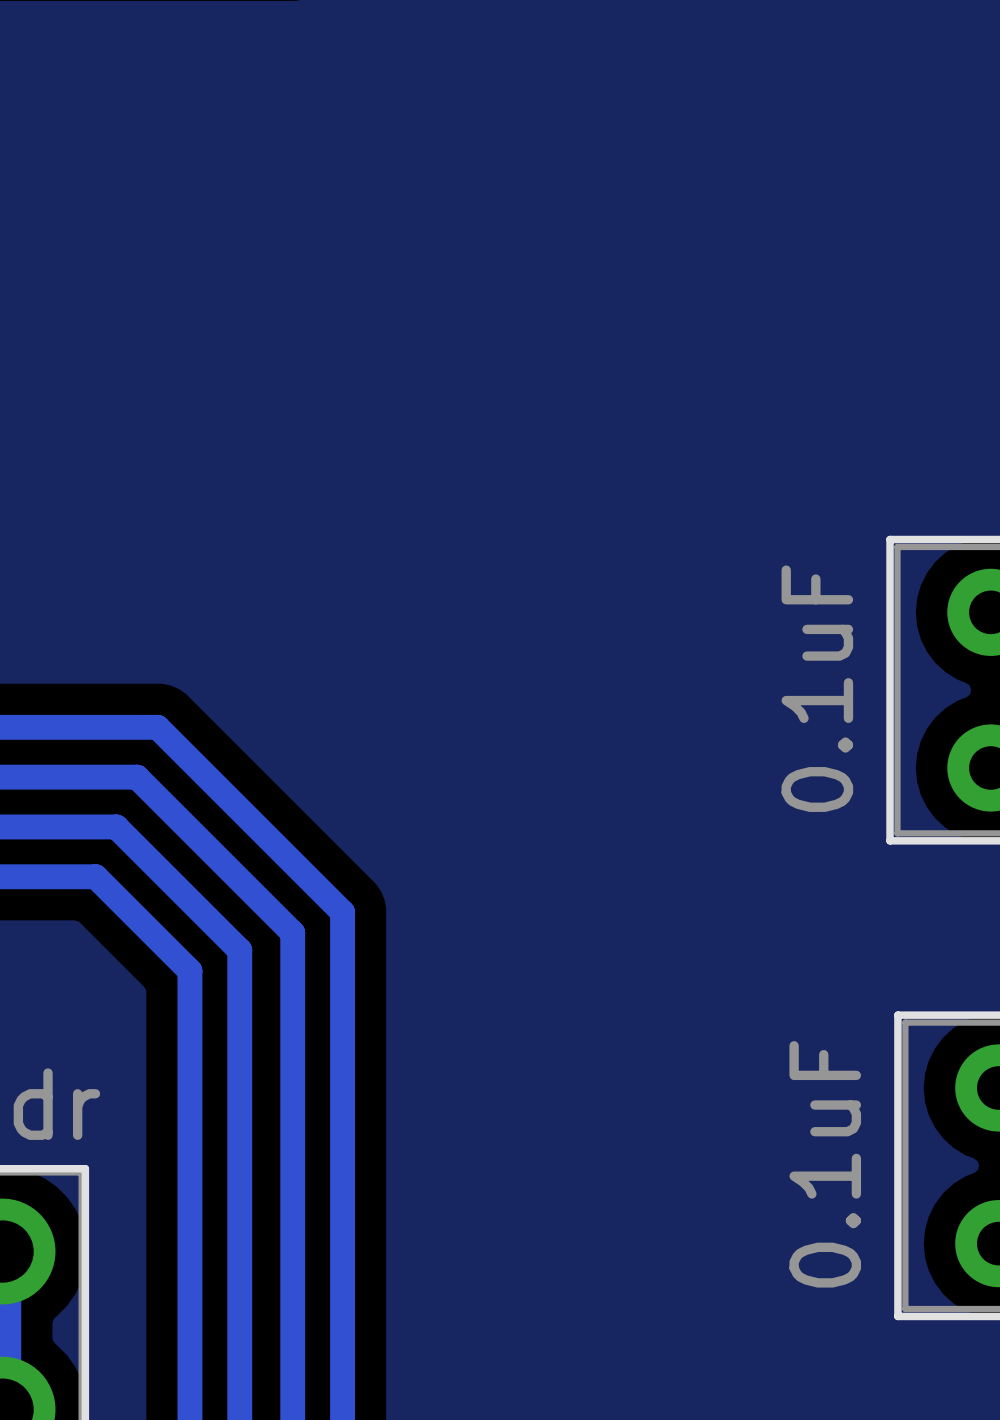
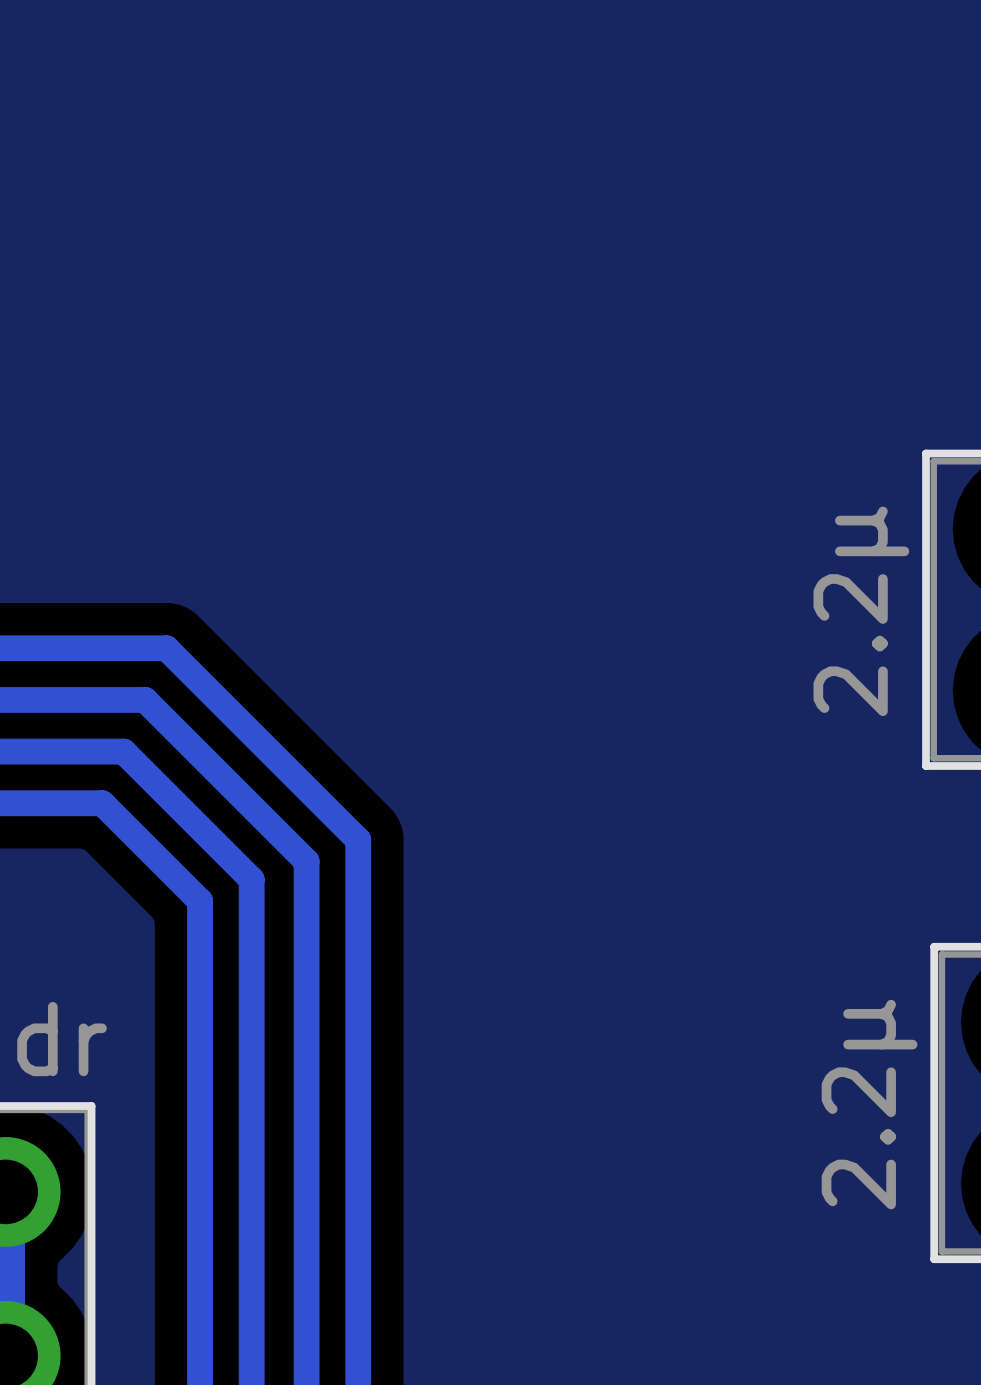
part value: 0.1uF (817, 688) -> 2.2µ (861, 611)
part value: 0.1uF (825, 1164) -> 2.2µ (869, 1104)

